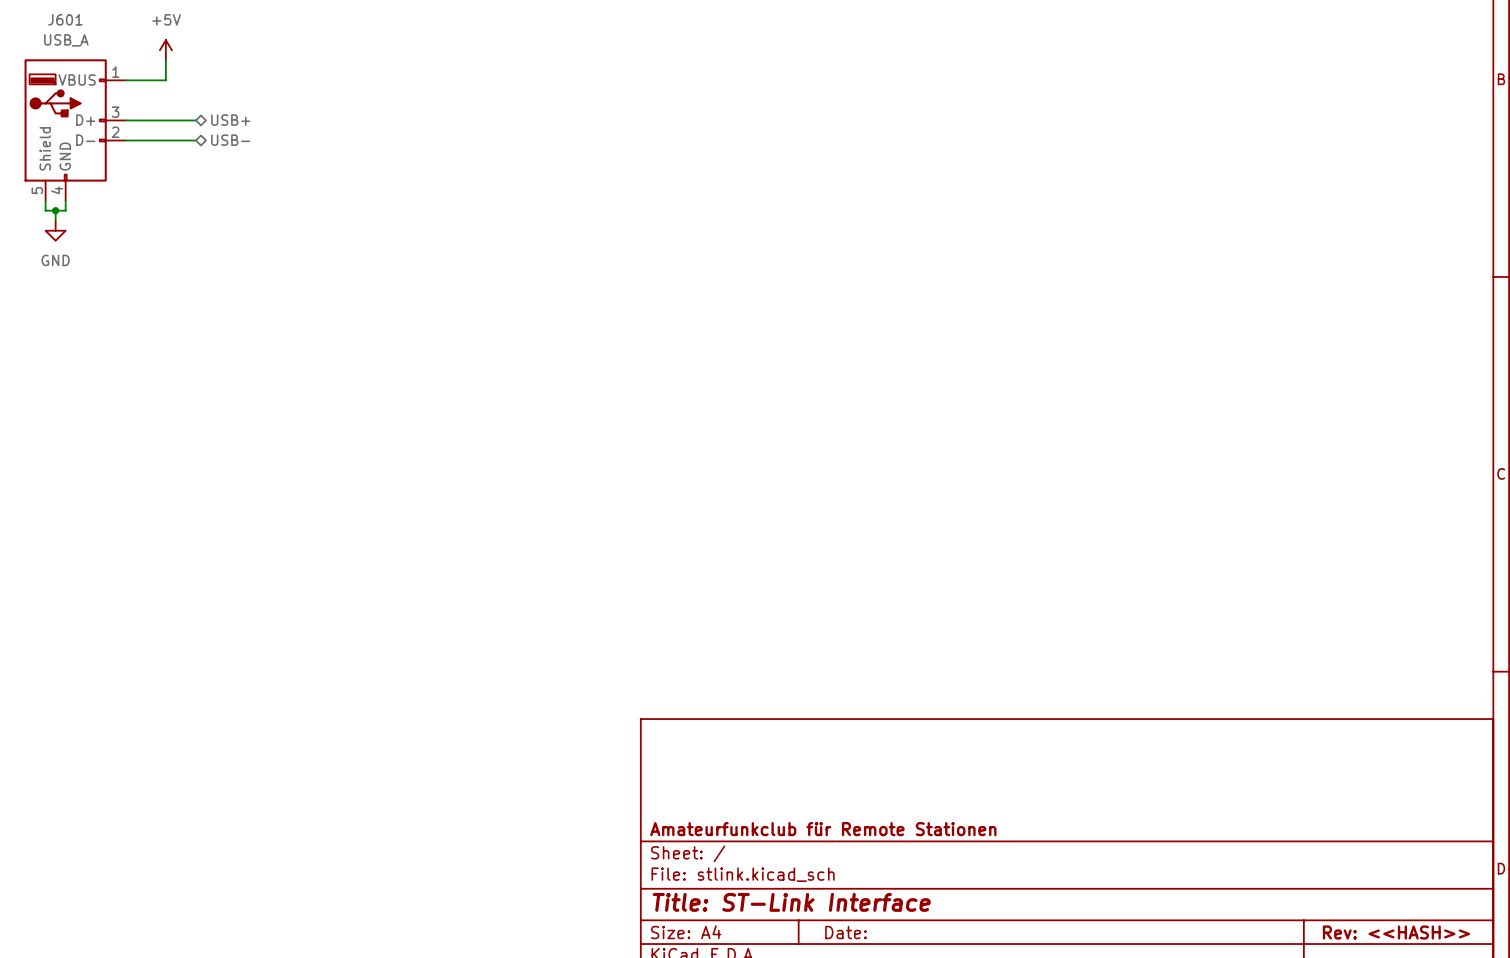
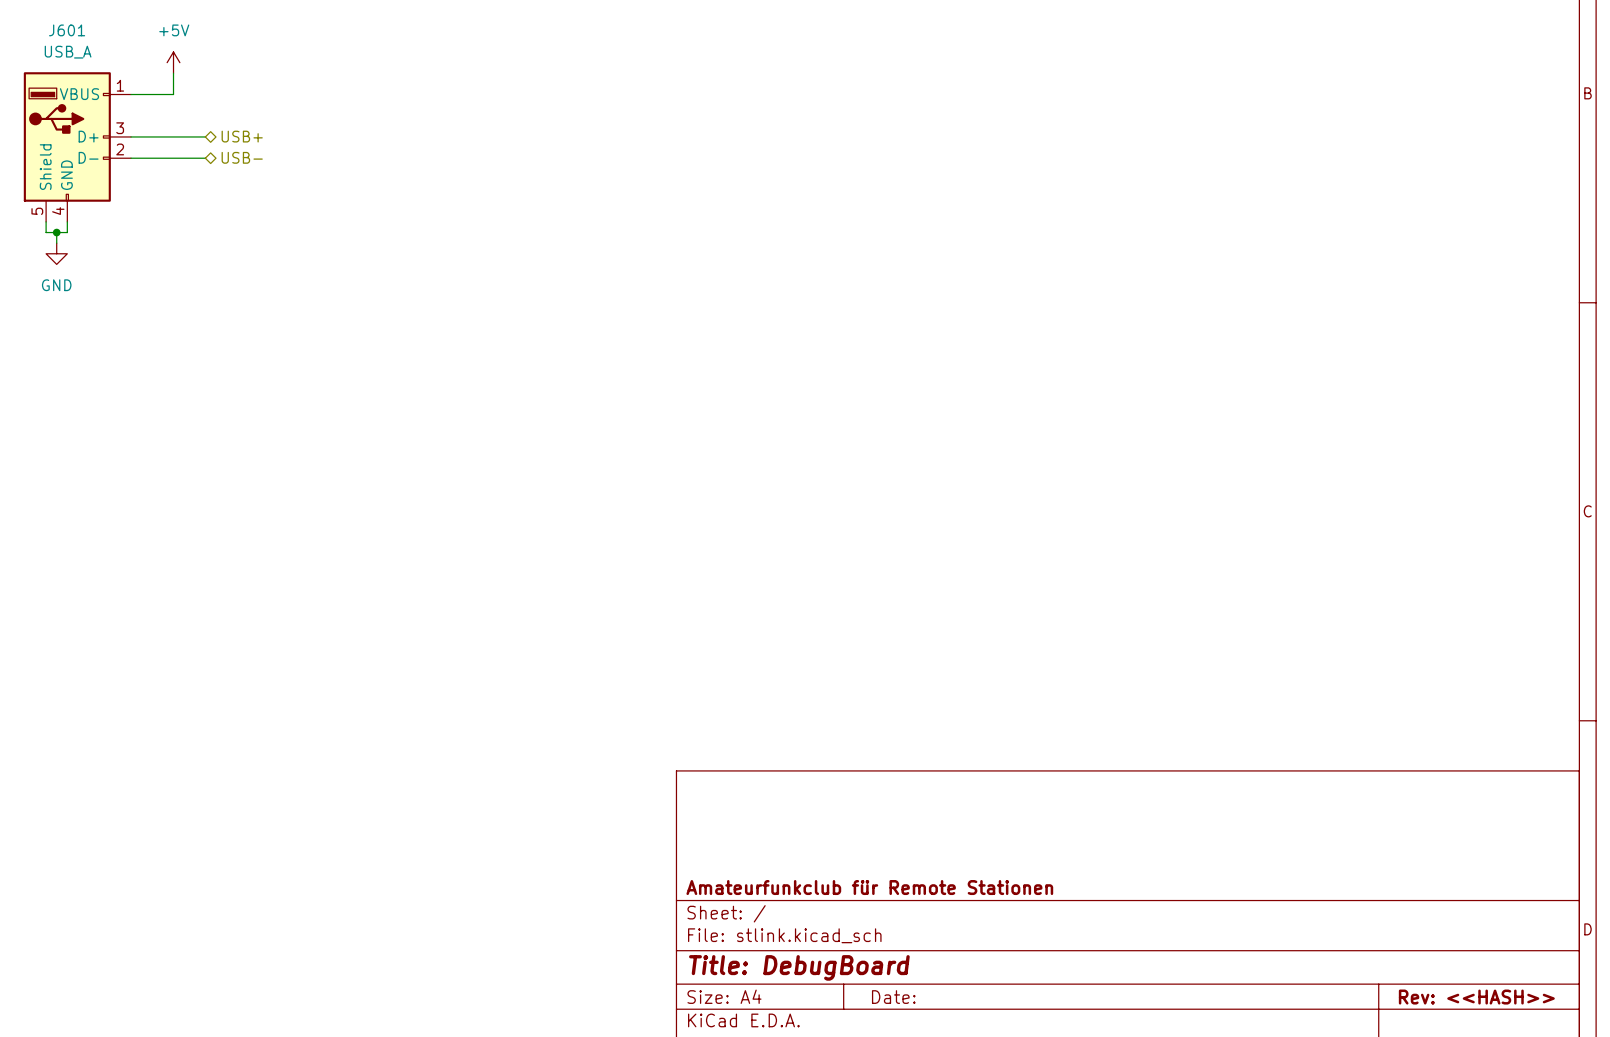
title block: Title: ST-Link Interface (791, 902) -> Title: DebugBoard (799, 967)

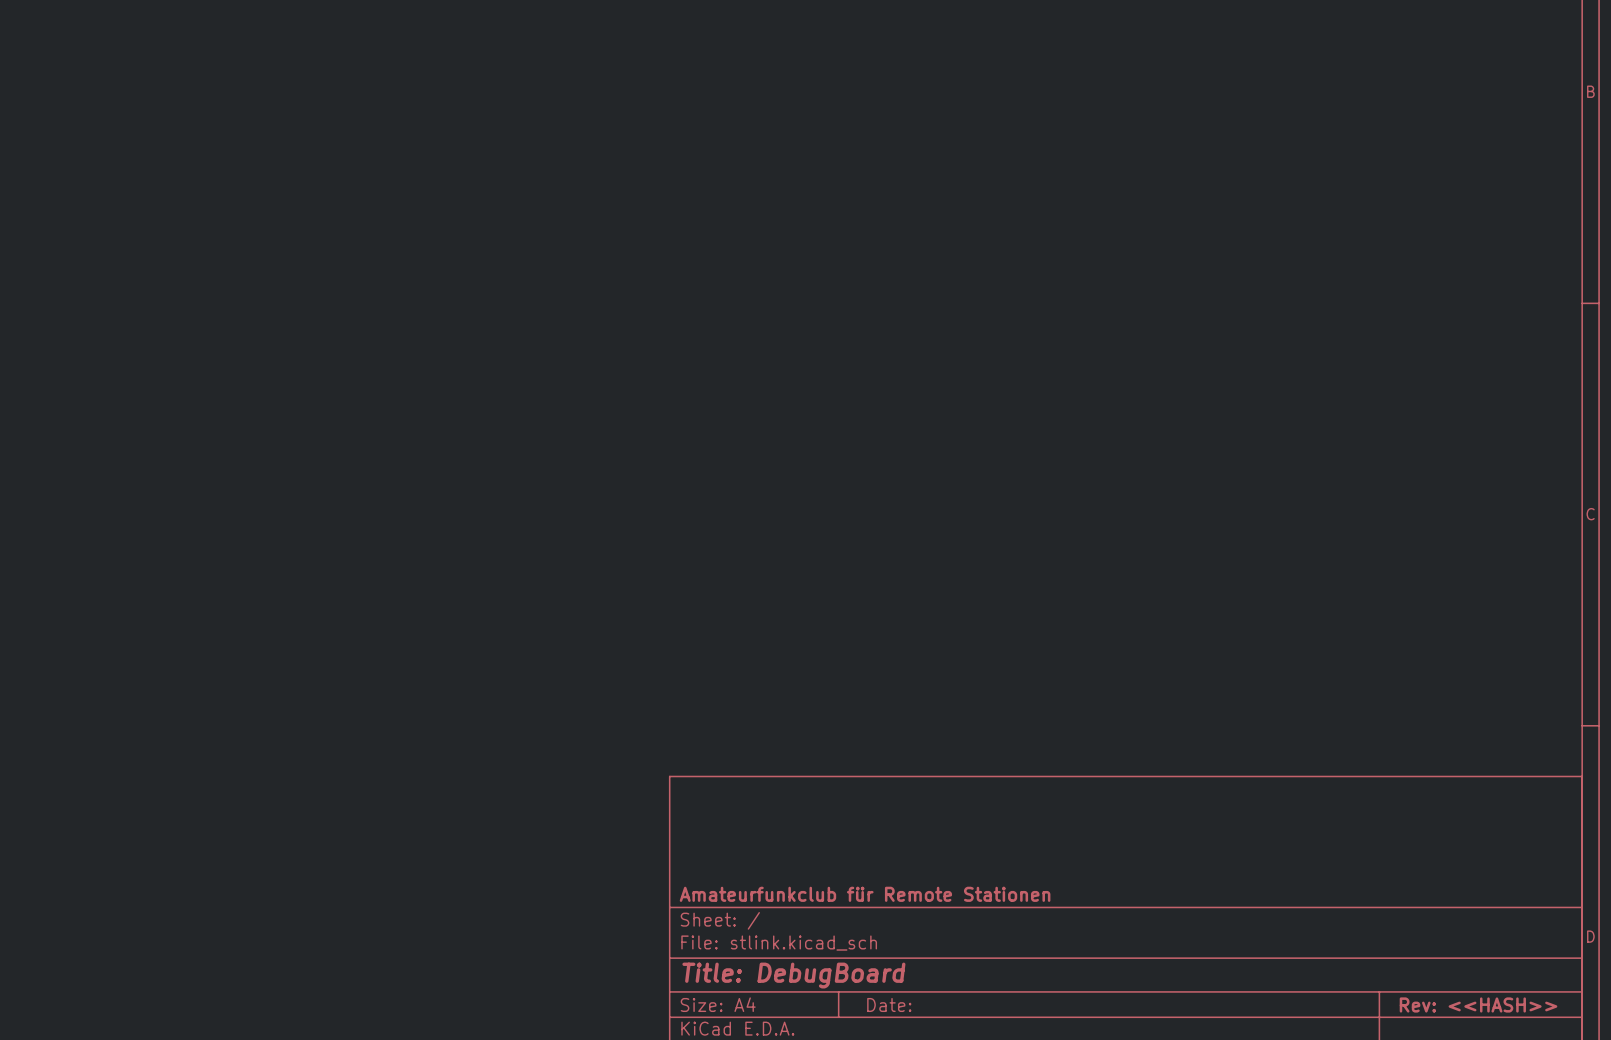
power symbol: +5V (173, 62) -> none
wire: (173, 73) (173, 94) (131, 94) -> none
wire: (131, 136) (205, 136) -> none
hierarchical label: USB+ (242, 136) -> none
J601: USB_A (77, 147) -> none
hierarchical label: USB- (242, 157) -> none
wire: (131, 158) (205, 158) -> none
wire: (46, 221) (46, 232) (67, 232) (67, 221) -> none
wire: (56, 232) (56, 243) -> none
junction: (56, 232) -> none
power symbol: GND (56, 253) -> none

